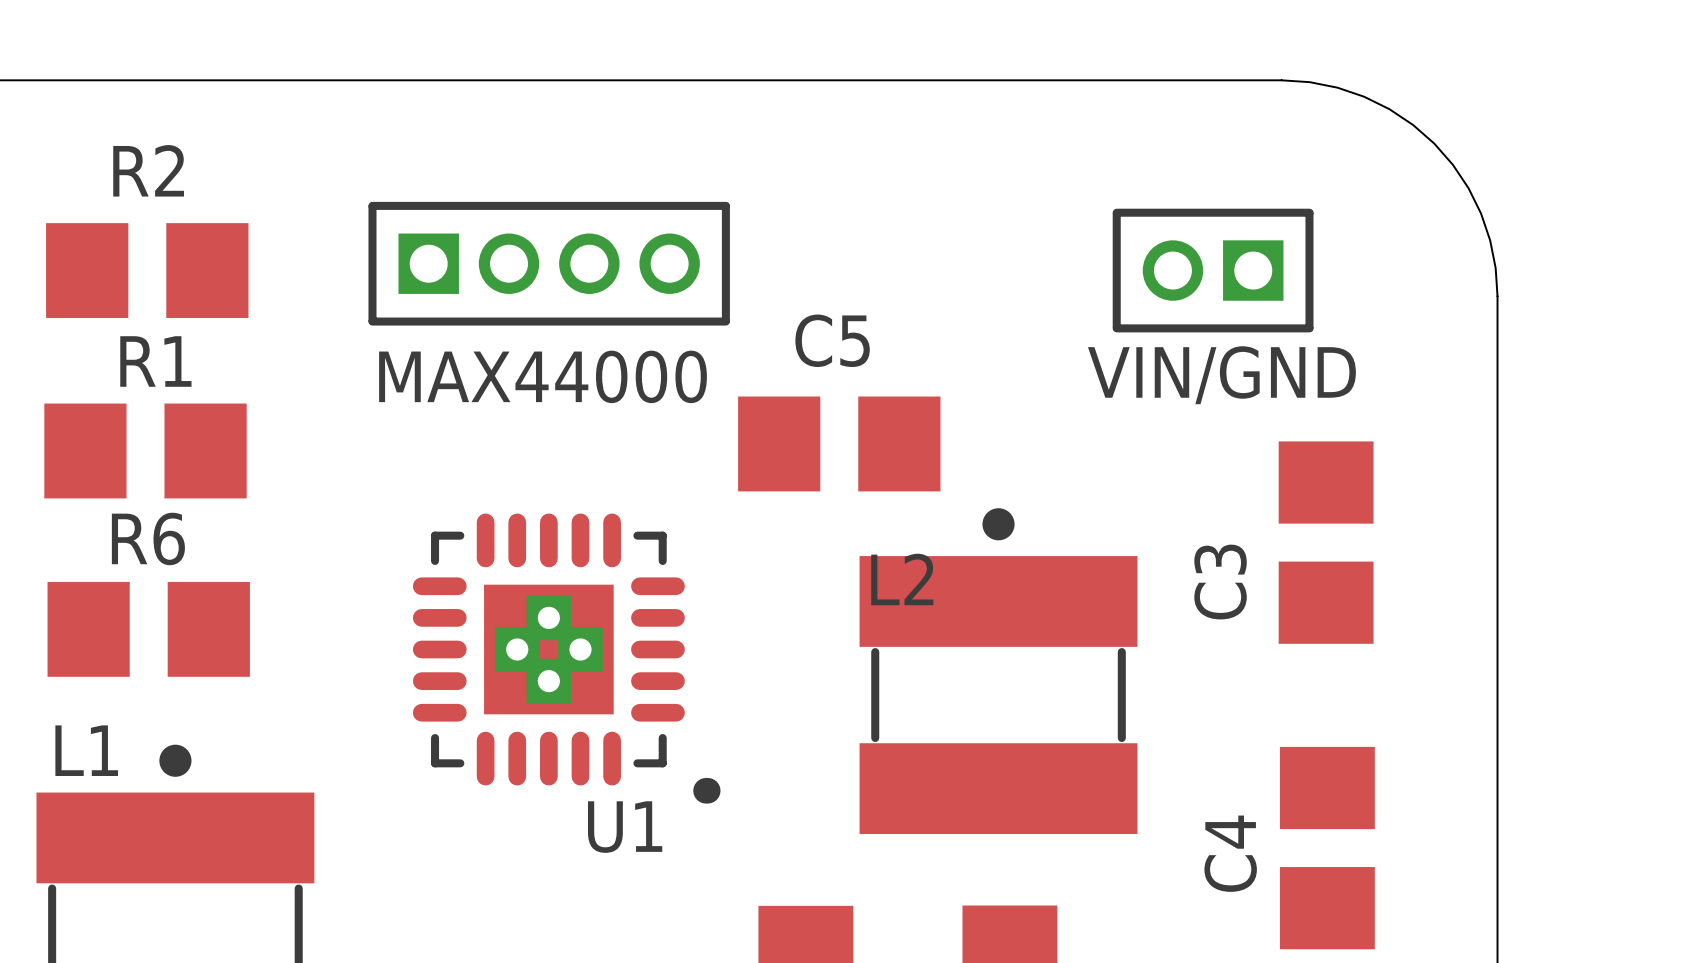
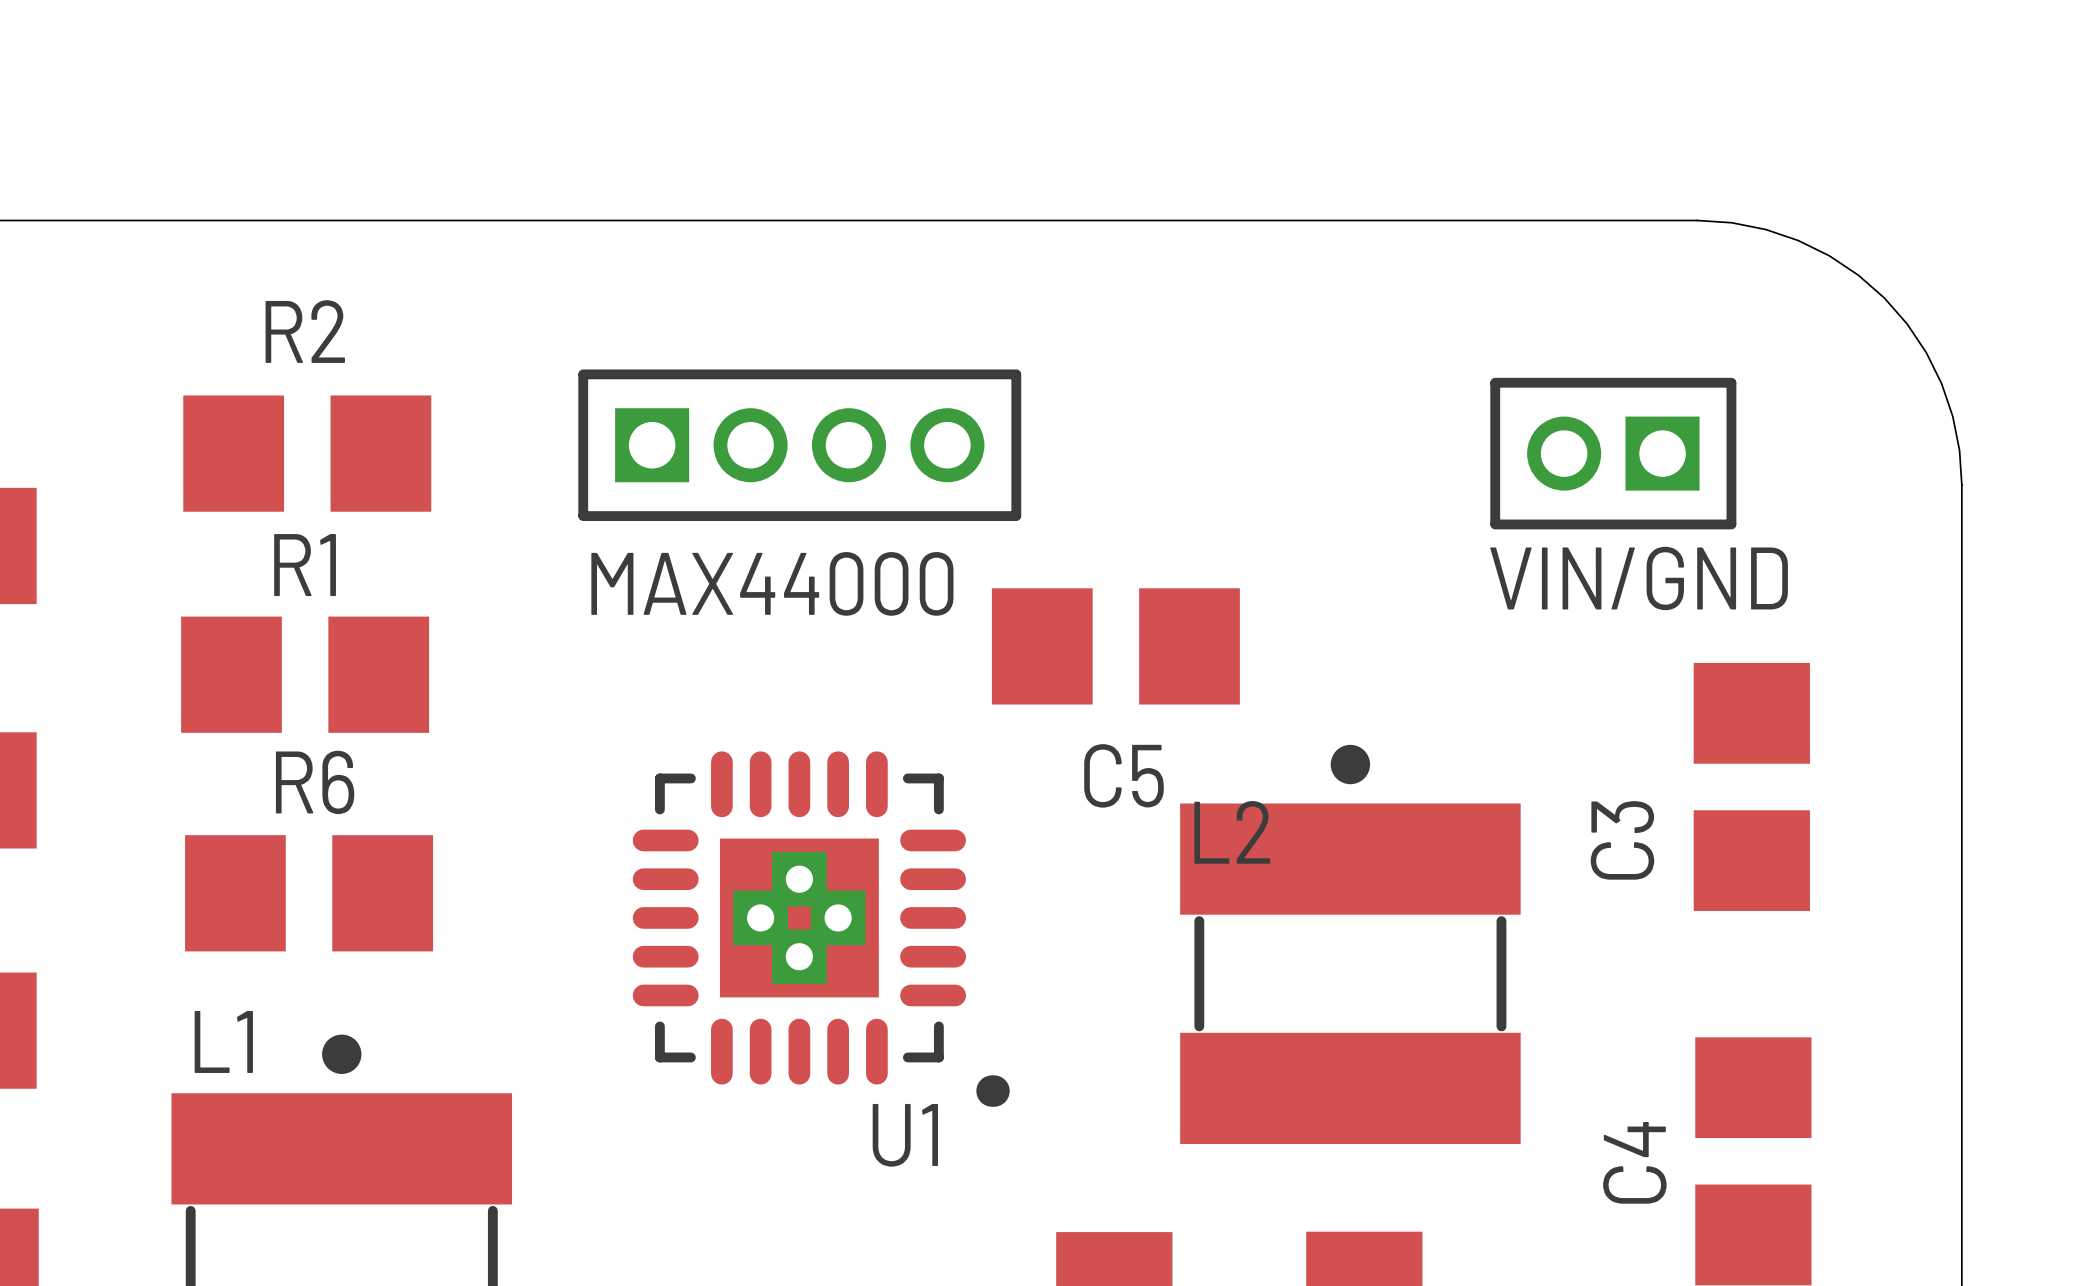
C5 name position: C5 (832, 340) -> C5 (1124, 775)
C5 position: (839, 443) -> (1115, 646)

